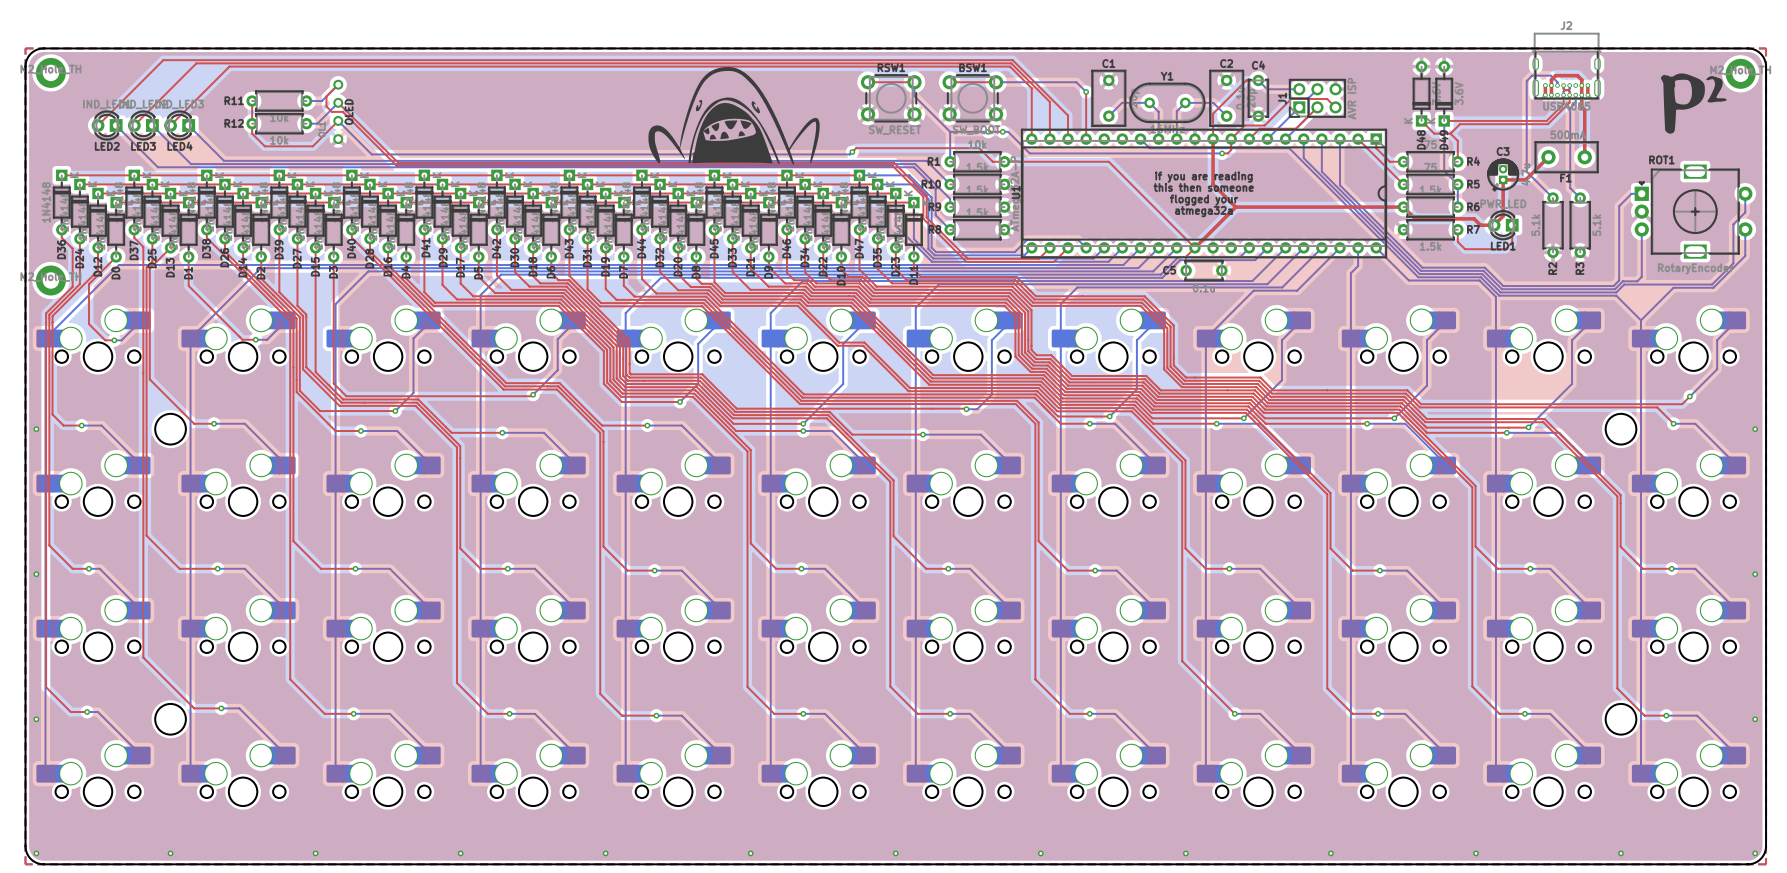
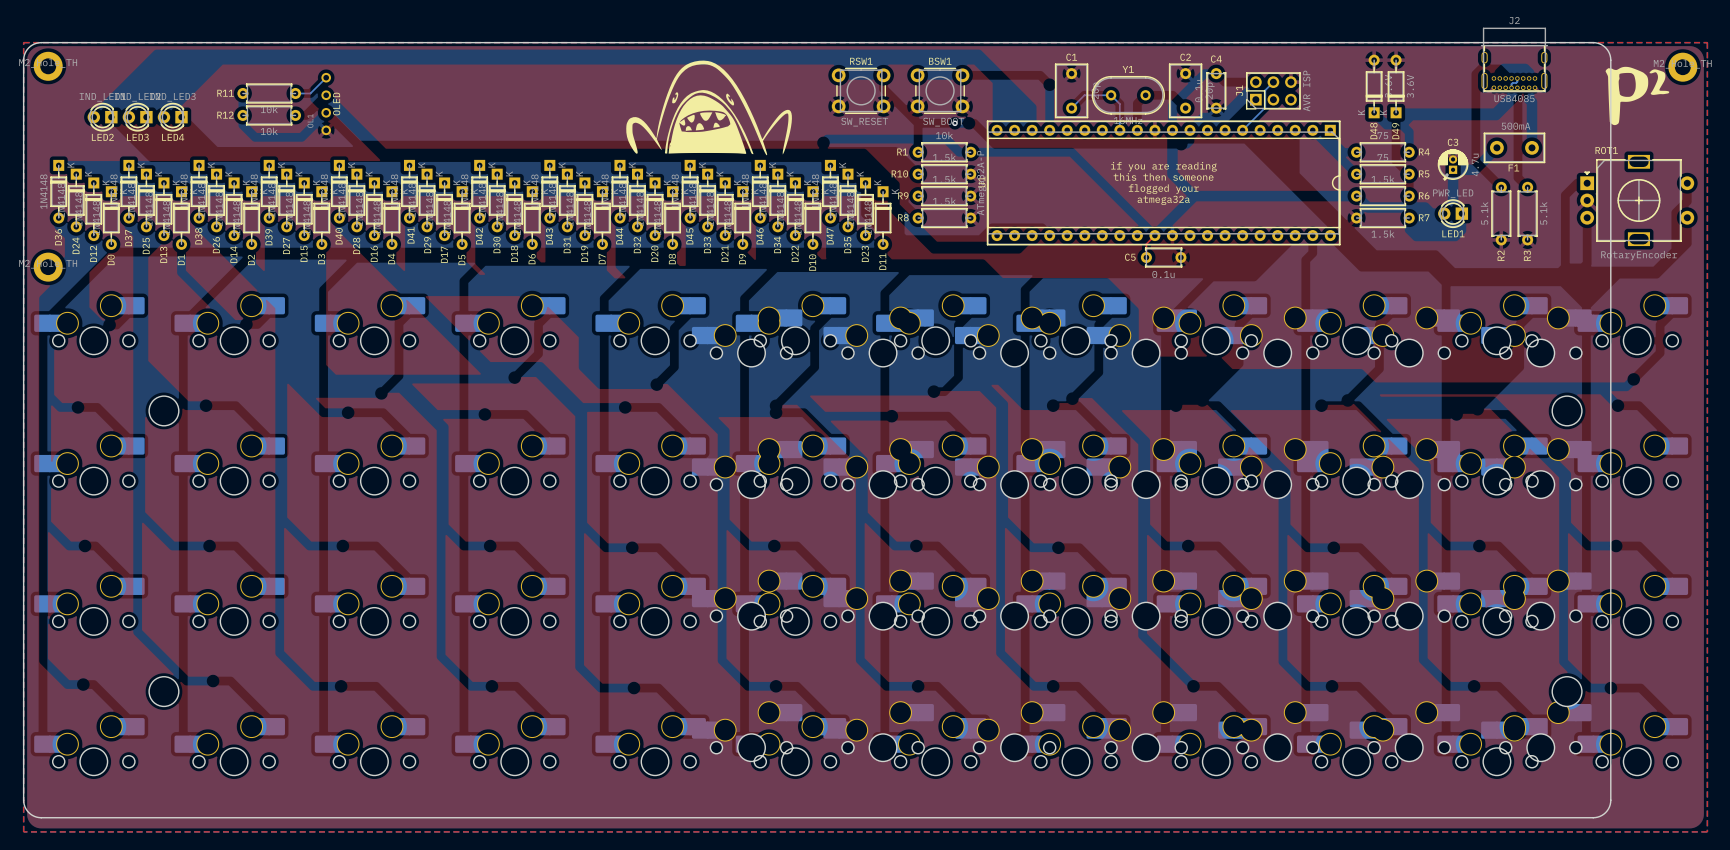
board edge: (1648, 48) (1750, 48) (1760, 53) (1765, 64) (1766, 846) (1763, 855) (1754, 862) (43, 864) (34, 861) (27, 855) (25, 848) (25, 831) -> (1593, 42) (1605, 47) (1610, 60) (1610, 800) (1608, 808) (1599, 816) (41, 817) (28, 812) (23, 800)
top track: (1258, 80) (1246, 80) (1213, 113) (1213, 184) (1235, 207) -> none
bottom track: (1258, 80) (1267, 89) (1299, 89) -> none
top track: (868, 82) (914, 82) -> none
bottom track: (914, 82) (914, 96) (950, 131) -> none
top track: (949, 82) (996, 82) -> none
bottom track: (996, 82) (1076, 82) (1086, 91) -> none
top track: (338, 84) (326, 96) (326, 106) (331, 111) (342, 111) (396, 165) (892, 165) (923, 196) (923, 218) (966, 261) (1053, 261) (1068, 247) -> none
top track: (1545, 85) (1545, 95) -> none
bottom track: (1557, 85) (1557, 82) (1550, 75) (1532, 75) (1526, 81) (1526, 171) (1553, 198) -> none
top track: (1563, 85) (1564, 90) (1569, 91) (1569, 102) (1548, 124) (1460, 124) (1450, 133) -> none
top track: (1587, 85) (1587, 95) -> none
top track: (1086, 91) (1086, 139) -> none
via: (1086, 91) -> none
top track: (1551, 95) (1551, 79) (1555, 75) (1577, 75) (1581, 79) (1581, 107) (1584, 110) (1584, 157) -> none
top track: (1563, 95) (1563, 104) (1546, 120) (1444, 120) -> none
bottom track: (1575, 95) (1575, 102) (1570, 108) (1570, 188) (1580, 198) -> none
top track: (252, 101) (252, 133) (264, 146) (312, 146) (338, 120) -> none
top track: (338, 102) (398, 162) (893, 162) (926, 195) (926, 217) (967, 258) (1039, 258) (1049, 247) -> none
bottom track: (338, 102) (317, 123) (306, 123) -> none
bottom track: (1299, 107) (1267, 139) -> none
top track: (1317, 107) (1296, 128) (1259, 128) (1249, 139) -> none
top track: (1335, 107) (1327, 99) (1291, 99) (1264, 125) (1244, 125) (1231, 139) (1231, 149) (1227, 153) (1222, 153) -> none
bottom track: (1226, 116) (1213, 102) (1185, 102) (1176, 111) (1176, 139) -> none
bottom track: (338, 120) (371, 154) (849, 154) (852, 152) -> none
top track: (1421, 120) (1434, 133) (1450, 133) -> none
bottom track: (1444, 120) (1444, 170) (1457, 184) (1457, 207) -> none
top track: (98, 125) (163, 60) (1012, 60) (1068, 115) (1068, 139) -> none
bottom track: (116, 125) (157, 167) (913, 167) (935, 188) (935, 215) (950, 229) -> none
top track: (134, 125) (196, 63) (1011, 63) (1049, 101) (1049, 139) -> none
bottom track: (152, 125) (190, 164) (915, 164) (950, 198) (950, 207) -> none
top track: (170, 125) (229, 66) (1010, 66) (1031, 88) (1031, 139) -> none
bottom track: (188, 125) (224, 160) (926, 160) (950, 184) -> none
bottom track: (950, 131) (950, 161) -> none
bottom track: (950, 131) (988, 131) -> none
top track: (988, 131) (1002, 131) -> none
bottom track: (1002, 131) (1008, 131) (1029, 153) (1222, 153) -> none
via: (1002, 131) -> none
top track: (1450, 133) (1457, 140) (1457, 161) -> none
bottom track: (1140, 139) (1149, 148) (1289, 148) (1418, 277) (1480, 277) (1499, 295) (1616, 295) (1640, 320) -> none
bottom track: (1303, 139) (1303, 158) (1419, 274) (1482, 274) (1500, 292) (1616, 292) (1624, 284) (1712, 284) (1733, 263) (1733, 224) (1745, 212) (1745, 193) -> none
bottom track: (1321, 139) (1321, 171) (1421, 270) (1483, 270) (1501, 289) (1614, 289) (1622, 281) (1637, 281) (1641, 276) (1641, 229) -> none
bottom track: (1339, 139) (1339, 185) (1422, 267) (1484, 267) (1503, 286) (1613, 286) (1619, 280) (1619, 206) (1631, 193) (1641, 193) -> none
top track: (1358, 139) (1403, 184) -> none
top track: (1376, 139) (1376, 148) (1389, 161) (1403, 161) -> none
top track: (852, 152) (856, 148) (979, 148) (992, 161) (1108, 161) (1194, 247) (1235, 207) -> none
via: (852, 152) -> none
via: (1222, 153) -> none
top track: (1548, 157) (1525, 179) (1503, 179) (1503, 216) (1494, 225) (1480, 225) (1474, 218) (1415, 218) (1403, 207) (1235, 207) -> none
top track: (61, 175) (859, 175) -> none
bottom track: (859, 175) (909, 175) (931, 197) (931, 247) (936, 252) (1014, 252) (1027, 239) (1078, 239) (1086, 247) -> none
top track: (79, 184) (877, 184) -> none
bottom track: (877, 184) (913, 184) (928, 198) (928, 249) (934, 255) (1024, 255) (1031, 247) -> none
top track: (98, 193) (895, 193) -> none
bottom track: (895, 193) (895, 225) (932, 261) (1108, 261) (1122, 247) -> none
top track: (116, 202) (913, 202) -> none
bottom track: (913, 202) (913, 239) (933, 258) (1093, 258) (1104, 247) -> none
top track: (1512, 225) (1512, 242) (1505, 249) (1465, 249) (1457, 241) (1457, 229) -> none
top track: (61, 229) (61, 237) (72, 248) (72, 286) (46, 313) (46, 687) (70, 712) (87, 712) -> none
top track: (134, 229) (134, 237) (143, 246) (143, 657) (194, 708) (221, 708) -> none
top track: (206, 229) (206, 237) (290, 321) (290, 679) (324, 713) (353, 713) -> none
top track: (279, 229) (279, 292) (303, 315) (303, 369) (339, 405) (415, 405) (457, 447) (457, 683) (487, 713) (509, 713) -> none
top track: (351, 229) (351, 237) (503, 389) (557, 389) (600, 432) (600, 693) (622, 715) (656, 715) -> none
top track: (424, 229) (424, 292) (434, 302) (559, 302) (607, 349) (607, 382) (621, 396) (692, 396) (747, 451) (747, 687) (774, 713) (803, 713) -> none
top track: (496, 229) (496, 275) (511, 289) (565, 289) (619, 344) (619, 377) (626, 383) (698, 383) (732, 418) (826, 418) (890, 481) (890, 686) (917, 713) (950, 713) -> none
top track: (569, 229) (569, 275) (599, 306) (702, 306) (799, 404) (1015, 404) (1035, 423) (1035, 679) (1069, 713) (1089, 713) -> none
top track: (641, 229) (641, 278) (656, 293) (707, 293) (719, 305) (797, 305) (837, 345) (863, 345) (908, 391) (1037, 391) (1057, 411) (1131, 411) (1182, 461) (1182, 661) (1234, 713) -> none
top track: (714, 229) (714, 282) (725, 293) (803, 293) (809, 299) (853, 299) (932, 378) (1042, 378) (1062, 398) (1137, 398) (1151, 412) (1245, 412) (1327, 494) (1327, 688) (1352, 713) (1378, 713) -> none
top track: (786, 229) (786, 272) (794, 280) (808, 280) (814, 286) (858, 286) (871, 299) (1007, 299) (1021, 314) (1021, 353) (1033, 365) (1047, 365) (1068, 385) (1142, 385) (1156, 400) (1251, 400) (1263, 412) (1397, 412) (1472, 487) (1472, 686) (1499, 713) (1524, 713) -> none
top track: (859, 229) (859, 269) (876, 286) (1012, 286) (1031, 305) (1140, 305) (1164, 329) (1164, 369) (1181, 387) (1256, 387) (1269, 400) (1403, 400) (1425, 422) (1543, 422) (1617, 496) (1617, 688) (1644, 715) (1666, 715) -> none
bottom track: (1745, 229) (1745, 255) (1713, 287) (1673, 287) (1640, 320) -> none
top track: (79, 238) (79, 284) (49, 314) (49, 545) (72, 568) (88, 568) -> none
top track: (152, 238) (152, 261) (146, 267) (146, 535) (179, 568) (217, 568) -> none
top track: (224, 238) (224, 251) (293, 319) (293, 541) (321, 568) (355, 568) -> none
top track: (297, 238) (297, 305) (306, 314) (306, 367) (341, 402) (416, 402) (460, 445) (460, 548) (480, 568) (507, 568) -> none
top track: (369, 238) (369, 251) (504, 386) (558, 386) (603, 431) (603, 546) (627, 570) (654, 570) -> none
top track: (442, 238) (442, 284) (457, 299) (561, 299) (610, 348) (610, 381) (622, 393) (694, 393) (750, 450) (750, 543) (776, 568) (801, 568) -> none
top track: (515, 238) (515, 272) (529, 286) (566, 286) (623, 343) (623, 375) (628, 380) (699, 380) (733, 415) (828, 415) (893, 480) (893, 536) (926, 568) (948, 568) -> none
top track: (587, 238) (587, 289) (601, 303) (703, 303) (801, 400) (1017, 400) (1038, 422) (1038, 541) (1068, 570) (1095, 570) -> none
top track: (660, 238) (660, 272) (678, 290) (708, 290) (721, 302) (799, 302) (839, 342) (864, 342) (909, 388) (1038, 388) (1058, 408) (1133, 408) (1185, 460) (1185, 548) (1205, 568) (1229, 568) -> none
top track: (732, 238) (732, 271) (750, 289) (804, 289) (810, 296) (854, 296) (933, 375) (1043, 375) (1064, 395) (1138, 395) (1152, 409) (1247, 409) (1330, 493) (1330, 548) (1352, 570) (1379, 570) -> none
top track: (805, 238) (805, 272) (816, 283) (859, 283) (872, 296) (1008, 296) (1025, 312) (1025, 352) (1034, 362) (1049, 362) (1069, 382) (1143, 382) (1158, 396) (1252, 396) (1265, 409) (1399, 409) (1475, 485) (1475, 546) (1497, 568) (1530, 568) -> none
top track: (877, 238) (877, 268) (892, 283) (1013, 283) (1033, 302) (1141, 302) (1167, 328) (1167, 368) (1183, 383) (1257, 383) (1270, 396) (1404, 396) (1426, 418) (1544, 418) (1620, 494) (1620, 546) (1642, 568) (1671, 568) -> none
top track: (98, 247) (98, 270) (52, 316) (52, 414) (63, 425) (81, 425) -> none
top track: (170, 247) (149, 268) (149, 379) (194, 423) (214, 423) -> none
top track: (243, 247) (243, 265) (296, 318) (296, 392) (335, 430) (360, 430) -> none
top track: (315, 247) (315, 372) (342, 399) (418, 399) (451, 432) (502, 432) -> none
top track: (388, 247) (388, 265) (506, 383) (559, 383) (602, 425) (647, 425) -> none
top track: (460, 247) (460, 283) (473, 296) (562, 296) (613, 347) (613, 379) (624, 390) (695, 390) (736, 430) (803, 430) -> none
top track: (533, 247) (533, 276) (540, 283) (567, 283) (626, 341) (626, 374) (629, 377) (700, 377) (735, 411) (829, 411) (852, 434) (922, 434) -> none
top track: (605, 247) (605, 289) (616, 299) (704, 299) (802, 397) (1034, 397) (1060, 423) (1089, 423) -> none
top track: (678, 247) (678, 274) (690, 287) (710, 287) (722, 299) (800, 299) (806, 305) (850, 305) (929, 384) (1039, 384) (1060, 404) (1134, 404) (1153, 423) (1216, 423) -> none
top track: (750, 247) (750, 268) (768, 286) (805, 286) (812, 293) (855, 293) (868, 305) (1004, 305) (1015, 316) (1015, 356) (1030, 371) (1045, 371) (1065, 392) (1139, 392) (1154, 406) (1248, 406) (1265, 423) (1367, 423) -> none
top track: (823, 247) (823, 272) (830, 280) (861, 280) (873, 293) (1009, 293) (1028, 311) (1028, 351) (1036, 359) (1050, 359) (1070, 379) (1145, 379) (1159, 393) (1253, 393) (1266, 406) (1400, 406) (1427, 432) (1506, 432) -> none
top track: (895, 247) (895, 269) (906, 280) (1015, 280) (1034, 299) (1143, 299) (1170, 326) (1170, 366) (1184, 380) (1259, 380) (1271, 393) (1405, 393) (1419, 407) (1657, 407) (1673, 423) -> none
bottom track: (1140, 247) (1123, 264) (119, 264) (45, 338) (45, 773) -> none
bottom track: (1158, 247) (1138, 268) (260, 268) (190, 338) (190, 773) -> none
bottom track: (1176, 247) (1153, 271) (368, 271) (335, 304) (335, 773) -> none
bottom track: (1249, 247) (1240, 256) (1178, 256) (1160, 274) (501, 274) (480, 295) (480, 773) -> none
bottom track: (1267, 247) (1255, 260) (1179, 260) (1162, 277) (660, 277) (625, 313) (625, 773) -> none
bottom track: (1285, 247) (1252, 281) (802, 281) (770, 313) (770, 773) -> none
bottom track: (1303, 247) (1267, 284) (939, 284) (915, 307) (915, 773) -> none
bottom track: (1321, 247) (1282, 287) (1077, 287) (1060, 304) (1060, 773) -> none
bottom track: (1339, 247) (1297, 290) (1253, 290) (1205, 338) (1205, 773) -> none
bottom track: (1358, 247) (1358, 266) (1350, 273) (1350, 773) -> none
bottom track: (1376, 247) (1408, 280) (1479, 280) (1495, 296) (1495, 773) -> none
top track: (116, 256) (88, 284) (88, 324) (105, 340) (114, 340) -> none
top track: (188, 256) (188, 285) (242, 339) (255, 339) -> none
top track: (261, 256) (261, 278) (299, 317) (299, 390) (320, 411) (395, 411) -> none
top track: (333, 256) (333, 383) (346, 396) (533, 394) -> none
top track: (406, 256) (406, 278) (433, 305) (558, 305) (603, 351) (603, 383) (622, 401) (680, 401) -> none
top track: (478, 256) (478, 276) (495, 293) (563, 293) (616, 345) (616, 378) (625, 387) (696, 387) (733, 423) (803, 423) -> none
top track: (551, 256) (551, 272) (558, 280) (569, 280) (629, 340) (630, 374) (702, 374) (736, 408) (966, 409) -> none
top track: (623, 256) (623, 285) (634, 296) (706, 296) (803, 394) (1035, 394) (1058, 416) (1109, 416) -> none
top track: (696, 256) (696, 278) (701, 283) (711, 283) (723, 296) (801, 296) (808, 302) (851, 302) (930, 381) (1041, 381) (1061, 401) (1135, 401) (1152, 418) (1243, 418) -> none
top track: (768, 256) (768, 267) (785, 283) (807, 283) (813, 289) (857, 289) (869, 302) (1005, 302) (1018, 315) (1018, 355) (1032, 368) (1046, 368) (1066, 388) (1141, 388) (1155, 403) (1249, 403) (1264, 418) (1394, 418) -> none
top track: (841, 256) (841, 269) (848, 276) (862, 276) (875, 289) (1011, 289) (1031, 310) (1031, 349) (1036, 355) (1051, 355) (1072, 375) (1146, 375) (1160, 390) (1255, 390) (1267, 403) (1401, 403) (1426, 427) (1528, 427) -> none
top track: (913, 256) (913, 269) (921, 276) (1016, 276) (1035, 296) (1144, 296) (1173, 325) (1173, 365) (1185, 377) (1260, 377) (1273, 390) (1407, 390) (1421, 404) (1682, 404) (1689, 396) -> none
bottom track: (141, 320) (121, 340) (114, 340) -> none
bottom track: (286, 320) (267, 339) (255, 339) -> none
bottom track: (431, 320) (413, 338) (413, 392) (395, 411) -> none
bottom track: (576, 320) (557, 339) (557, 370) (533, 394) -> none
bottom track: (721, 320) (698, 343) (698, 383) (680, 401) -> none
bottom track: (866, 320) (843, 343) (843, 383) (803, 423) -> none
bottom track: (1011, 320) (991, 340) (991, 394) (977, 409) (966, 409) -> none
bottom track: (1156, 320) (1136, 340) (1136, 389) (1109, 416) -> none
bottom track: (1301, 320) (1281, 340) (1281, 380) (1243, 418) -> none
bottom track: (1446, 320) (1427, 340) (1427, 385) (1394, 418) -> none
bottom track: (1591, 320) (1572, 340) (1572, 383) (1528, 427) -> none
bottom track: (1640, 320) (1640, 773) -> none
bottom track: (1736, 320) (1717, 340) (1717, 369) (1689, 396) -> none
via: (255, 339) -> none
via: (114, 340) -> none
part: none -> (747, 336)
part: none -> (878, 336)
part: none -> (1010, 336)
part: none -> (1141, 336)
part: none -> (1273, 336)
part: none -> (1404, 336)
part: none -> (1536, 336)
via: (533, 394) -> none
via: (1689, 396) -> none
via: (680, 401) -> none
via: (966, 409) -> none
via: (395, 411) -> none
via: (1109, 416) -> none
via: (1243, 418) -> none
via: (1394, 418) -> none
bottom track: (214, 423) (244, 423) (286, 465) -> none
via: (214, 423) -> none
via: (803, 423) -> none
bottom track: (1089, 423) (1115, 423) (1156, 465) -> none
via: (1089, 423) -> none
bottom track: (1216, 423) (1260, 423) (1301, 465) -> none
via: (1216, 423) -> none
bottom track: (1367, 423) (1405, 423) (1446, 465) -> none
via: (1367, 423) -> none
bottom track: (1673, 423) (1695, 423) (1736, 465) -> none
via: (1673, 423) -> none
bottom track: (81, 425) (101, 425) (141, 465) -> none
via: (81, 425) -> none
bottom track: (647, 425) (681, 425) (721, 465) -> none
via: (647, 425) -> none
via: (1528, 427) -> none
via: (36, 429) -> none
via: (1755, 429) -> none
bottom track: (360, 430) (397, 430) (431, 465) -> none
via: (360, 430) -> none
bottom track: (803, 430) (832, 430) (866, 465) -> none
via: (803, 430) -> none
bottom track: (502, 432) (544, 432) (576, 465) -> none
via: (502, 432) -> none
bottom track: (1506, 432) (1559, 432) (1591, 465) -> none
via: (1506, 432) -> none
bottom track: (922, 434) (980, 434) (1011, 465) -> none
via: (922, 434) -> none
part: none -> (747, 468)
part: none -> (878, 468)
part: none -> (1010, 468)
part: none -> (1141, 468)
part: none -> (1273, 468)
part: none -> (1404, 468)
part: none -> (1536, 468)
bottom track: (88, 568) (99, 568) (141, 610) -> none
via: (88, 568) -> none
bottom track: (217, 568) (244, 568) (286, 610) -> none
via: (217, 568) -> none
bottom track: (355, 568) (389, 568) (431, 610) -> none
via: (355, 568) -> none
bottom track: (507, 568) (534, 568) (576, 610) -> none
via: (507, 568) -> none
bottom track: (801, 568) (825, 568) (866, 610) -> none
via: (801, 568) -> none
bottom track: (948, 568) (970, 568) (1011, 610) -> none
via: (948, 568) -> none
bottom track: (1229, 568) (1260, 568) (1301, 610) -> none
via: (1229, 568) -> none
bottom track: (1530, 568) (1550, 568) (1591, 610) -> none
via: (1530, 568) -> none
bottom track: (1671, 568) (1695, 568) (1736, 610) -> none
via: (1671, 568) -> none
bottom track: (654, 570) (681, 570) (721, 610) -> none
via: (654, 570) -> none
bottom track: (1095, 570) (1116, 570) (1156, 610) -> none
via: (1095, 570) -> none
bottom track: (1379, 570) (1407, 570) (1446, 610) -> none
via: (1379, 570) -> none
via: (36, 574) -> none
via: (1755, 574) -> none
part: none -> (747, 599)
part: none -> (878, 599)
part: none -> (1010, 599)
part: none -> (1141, 599)
part: none -> (1273, 599)
part: none -> (1404, 599)
part: none -> (1536, 599)
bottom track: (221, 708) (239, 708) (286, 755) -> none
via: (221, 708) -> none
bottom track: (87, 712) (97, 712) (141, 755) -> none
via: (87, 712) -> none
bottom track: (353, 713) (389, 713) (431, 755) -> none
via: (353, 713) -> none
bottom track: (509, 713) (534, 713) (576, 755) -> none
via: (509, 713) -> none
bottom track: (803, 713) (825, 713) (866, 755) -> none
via: (803, 713) -> none
bottom track: (950, 713) (970, 713) (1011, 755) -> none
via: (950, 713) -> none
bottom track: (1089, 713) (1115, 713) (1156, 755) -> none
via: (1089, 713) -> none
bottom track: (1234, 713) (1260, 713) (1301, 755) -> none
via: (1234, 713) -> none
bottom track: (1378, 713) (1405, 713) (1446, 755) -> none
via: (1378, 713) -> none
bottom track: (1524, 713) (1550, 713) (1591, 755) -> none
via: (1524, 713) -> none
bottom track: (656, 715) (681, 715) (721, 755) -> none
via: (656, 715) -> none
bottom track: (1666, 715) (1697, 715) (1736, 755) -> none
via: (1666, 715) -> none
via: (36, 719) -> none
via: (1755, 719) -> none
part: none -> (747, 731)
part: none -> (878, 731)
part: none -> (1010, 731)
part: none -> (1141, 731)
part: none -> (1273, 731)
part: none -> (1404, 731)
part: none -> (1536, 731)
via: (36, 853) -> none
via: (170, 853) -> none
via: (315, 853) -> none
via: (460, 853) -> none
via: (605, 853) -> none
via: (750, 853) -> none
via: (895, 853) -> none
via: (1040, 853) -> none
via: (1185, 853) -> none
via: (1330, 853) -> none
via: (1475, 853) -> none
via: (1621, 853) -> none
via: (1755, 853) -> none

